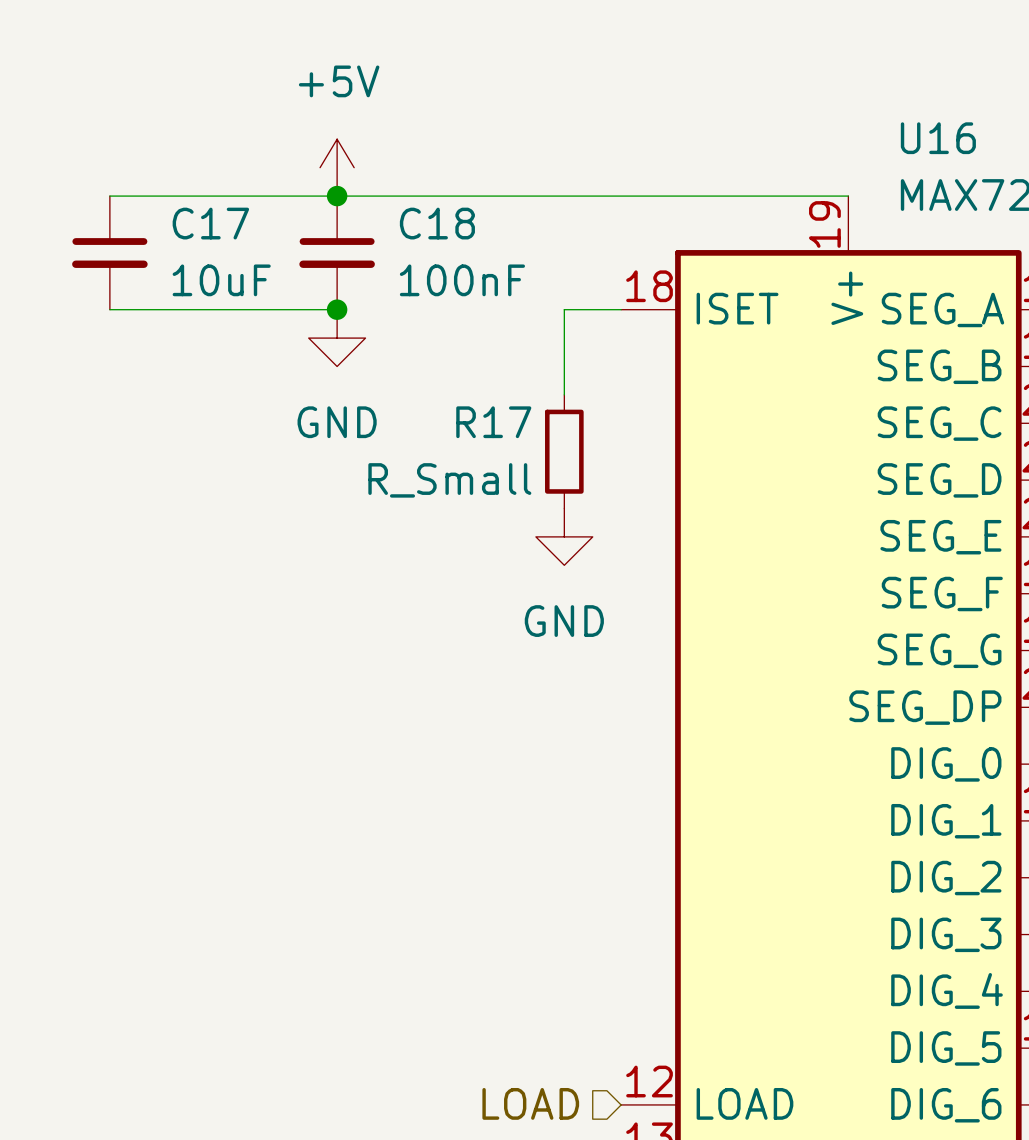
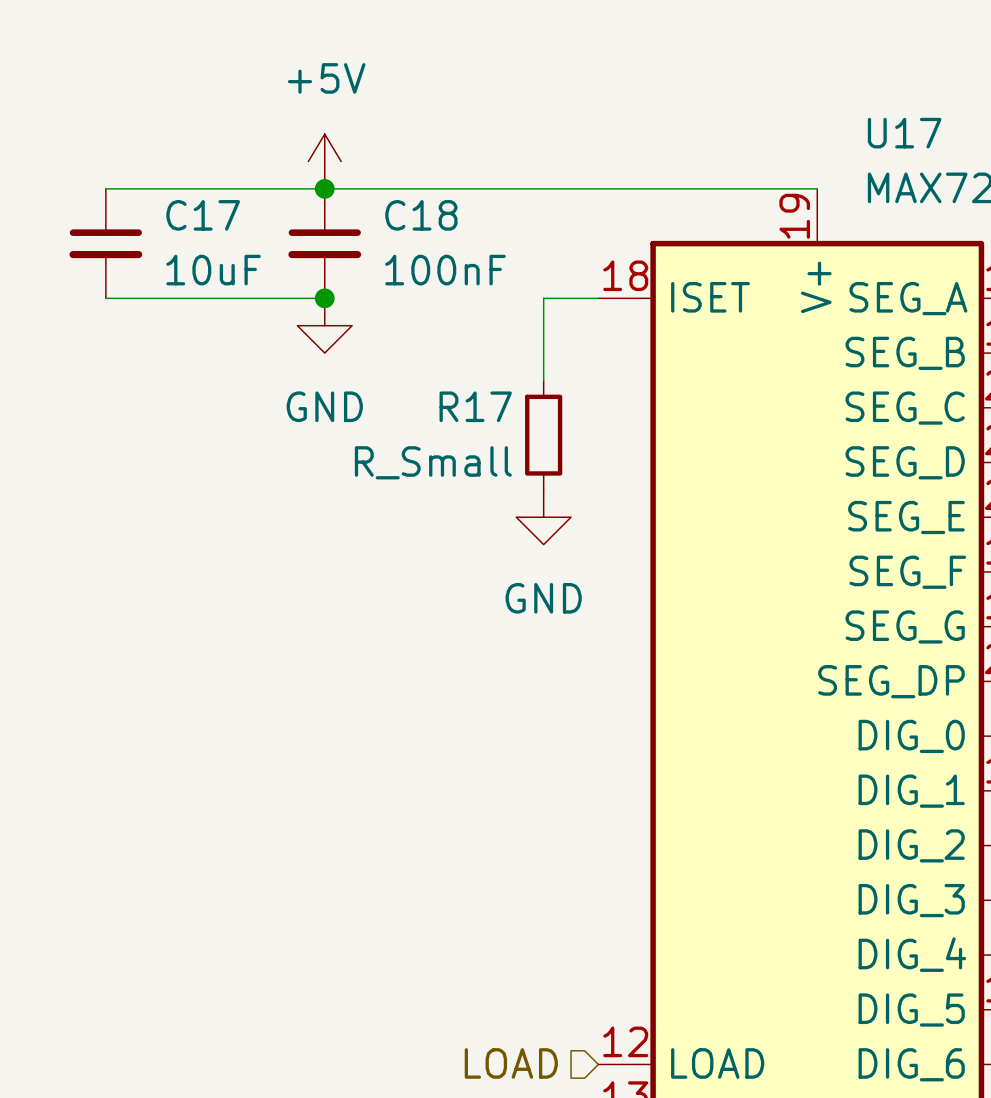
U16 name: U16 (938, 138) -> U17 (904, 133)

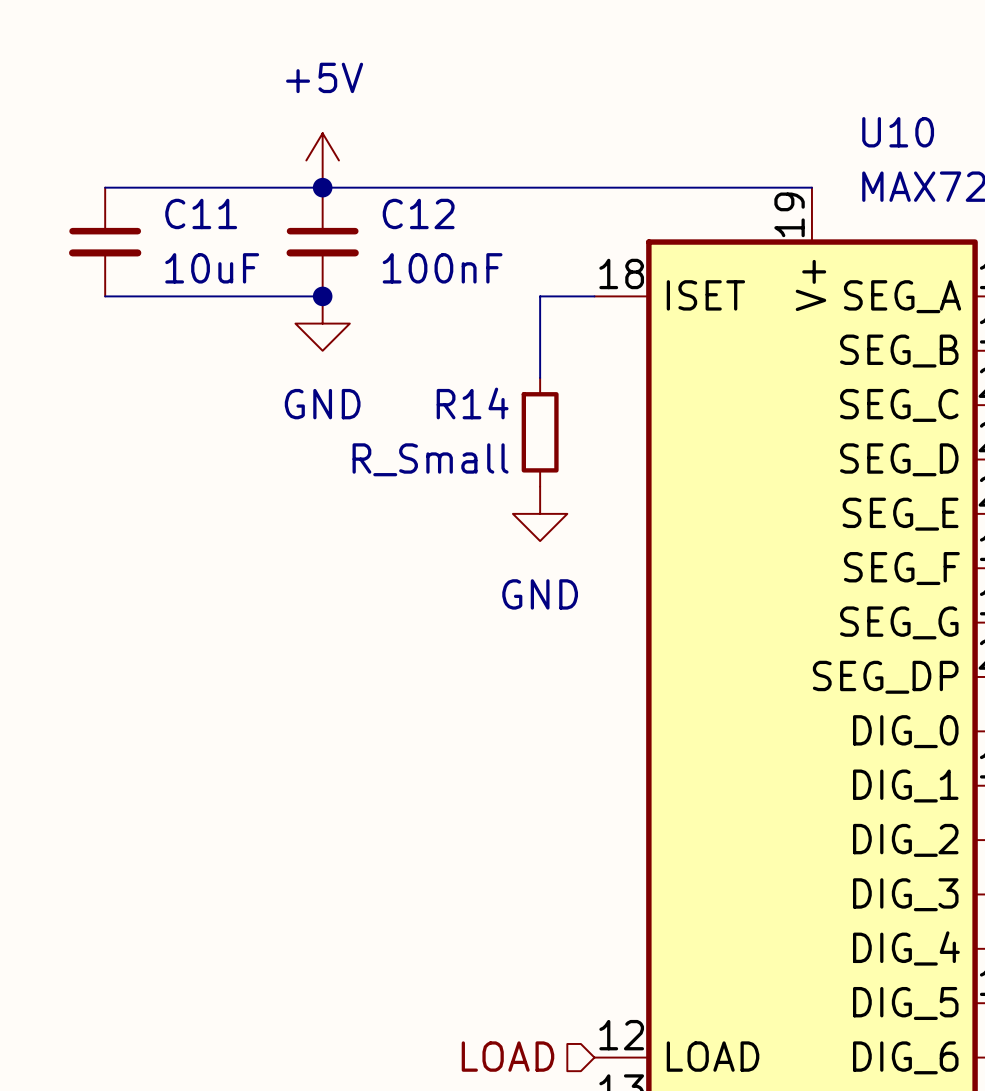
U17 name: U17 (904, 133) -> U10 (898, 132)
C17 name: C17 (203, 215) -> C11 (201, 213)
C18 name: C18 (421, 215) -> C12 (418, 213)
R17 name: R17 (475, 406) -> R14 (472, 403)

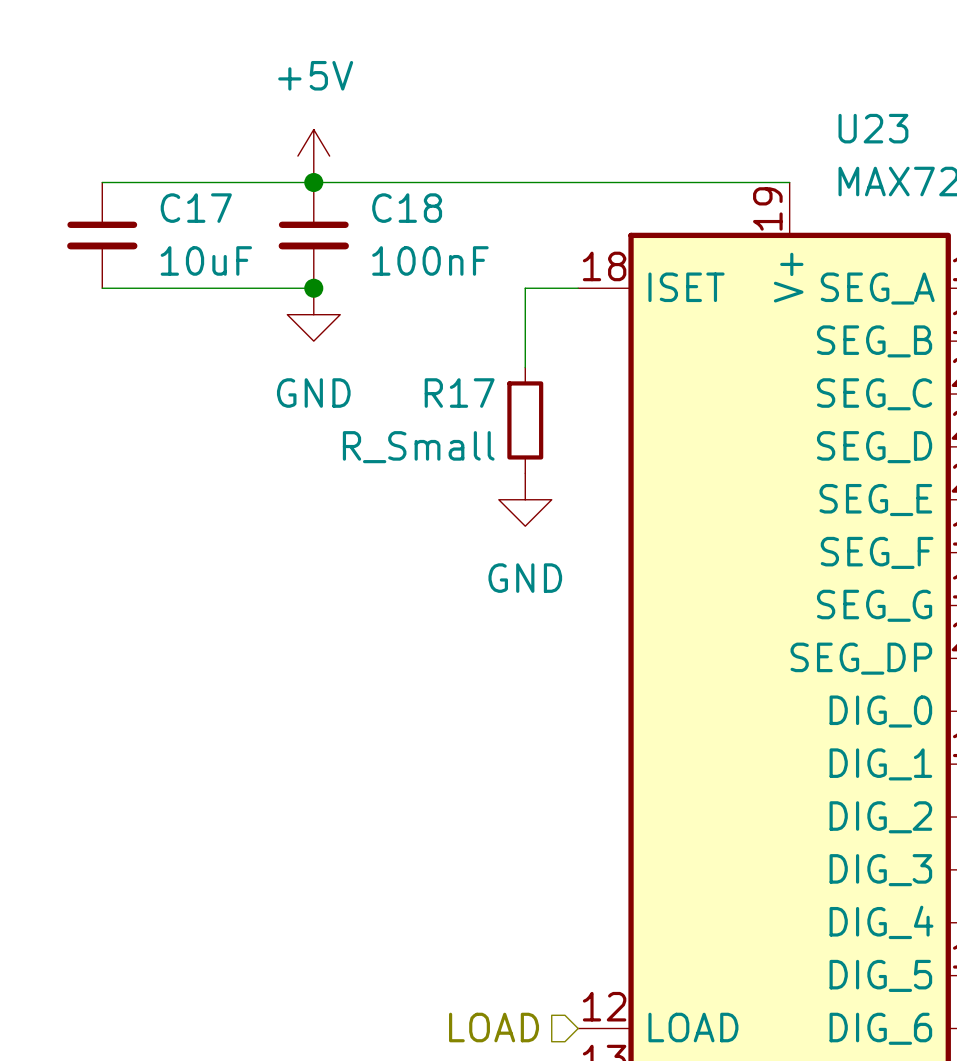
U10 name: U10 (898, 132) -> U23 (873, 128)
C11 name: C11 (201, 213) -> C17 (196, 208)
C12 name: C12 (418, 213) -> C18 (407, 208)
R14 name: R14 (472, 403) -> R17 (459, 393)

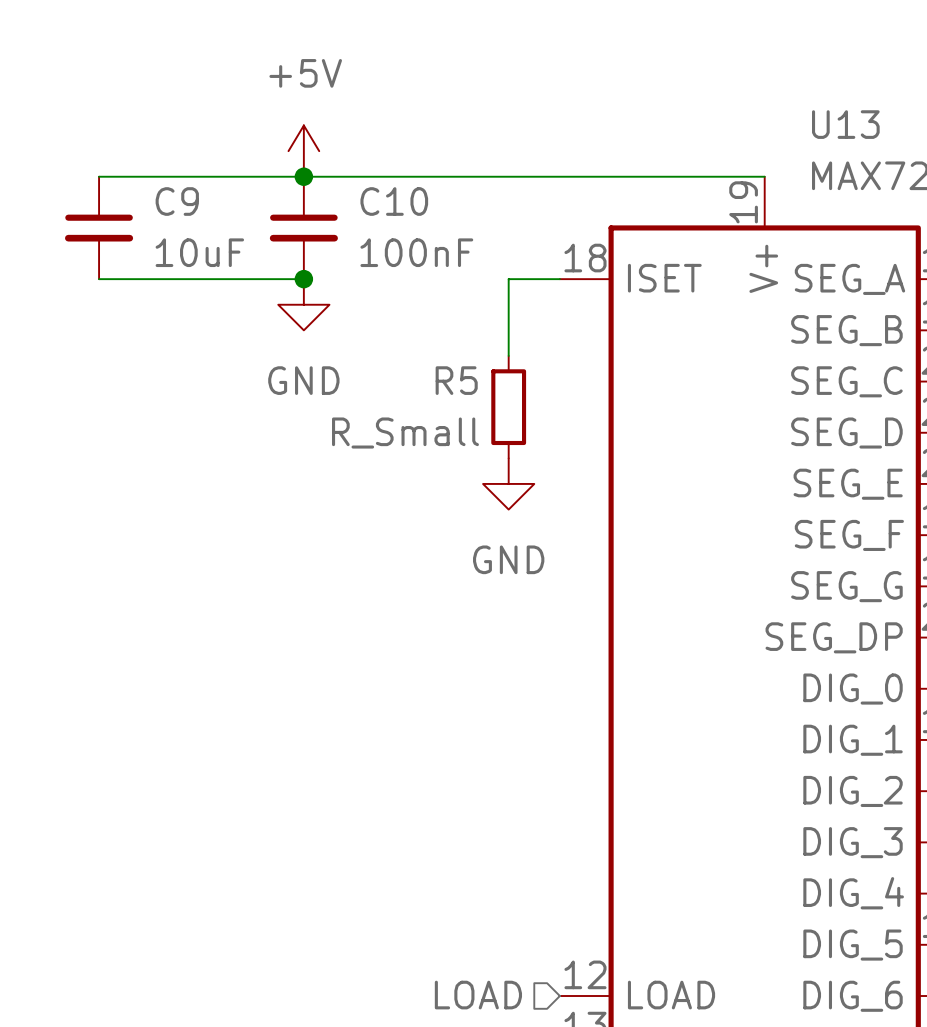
U23 name: U23 (873, 128) -> U13 (845, 124)
C17 name: C17 (196, 208) -> C9 (177, 201)
C18 name: C18 (407, 208) -> C10 (394, 201)
R17 name: R17 (459, 393) -> R5 (456, 380)

